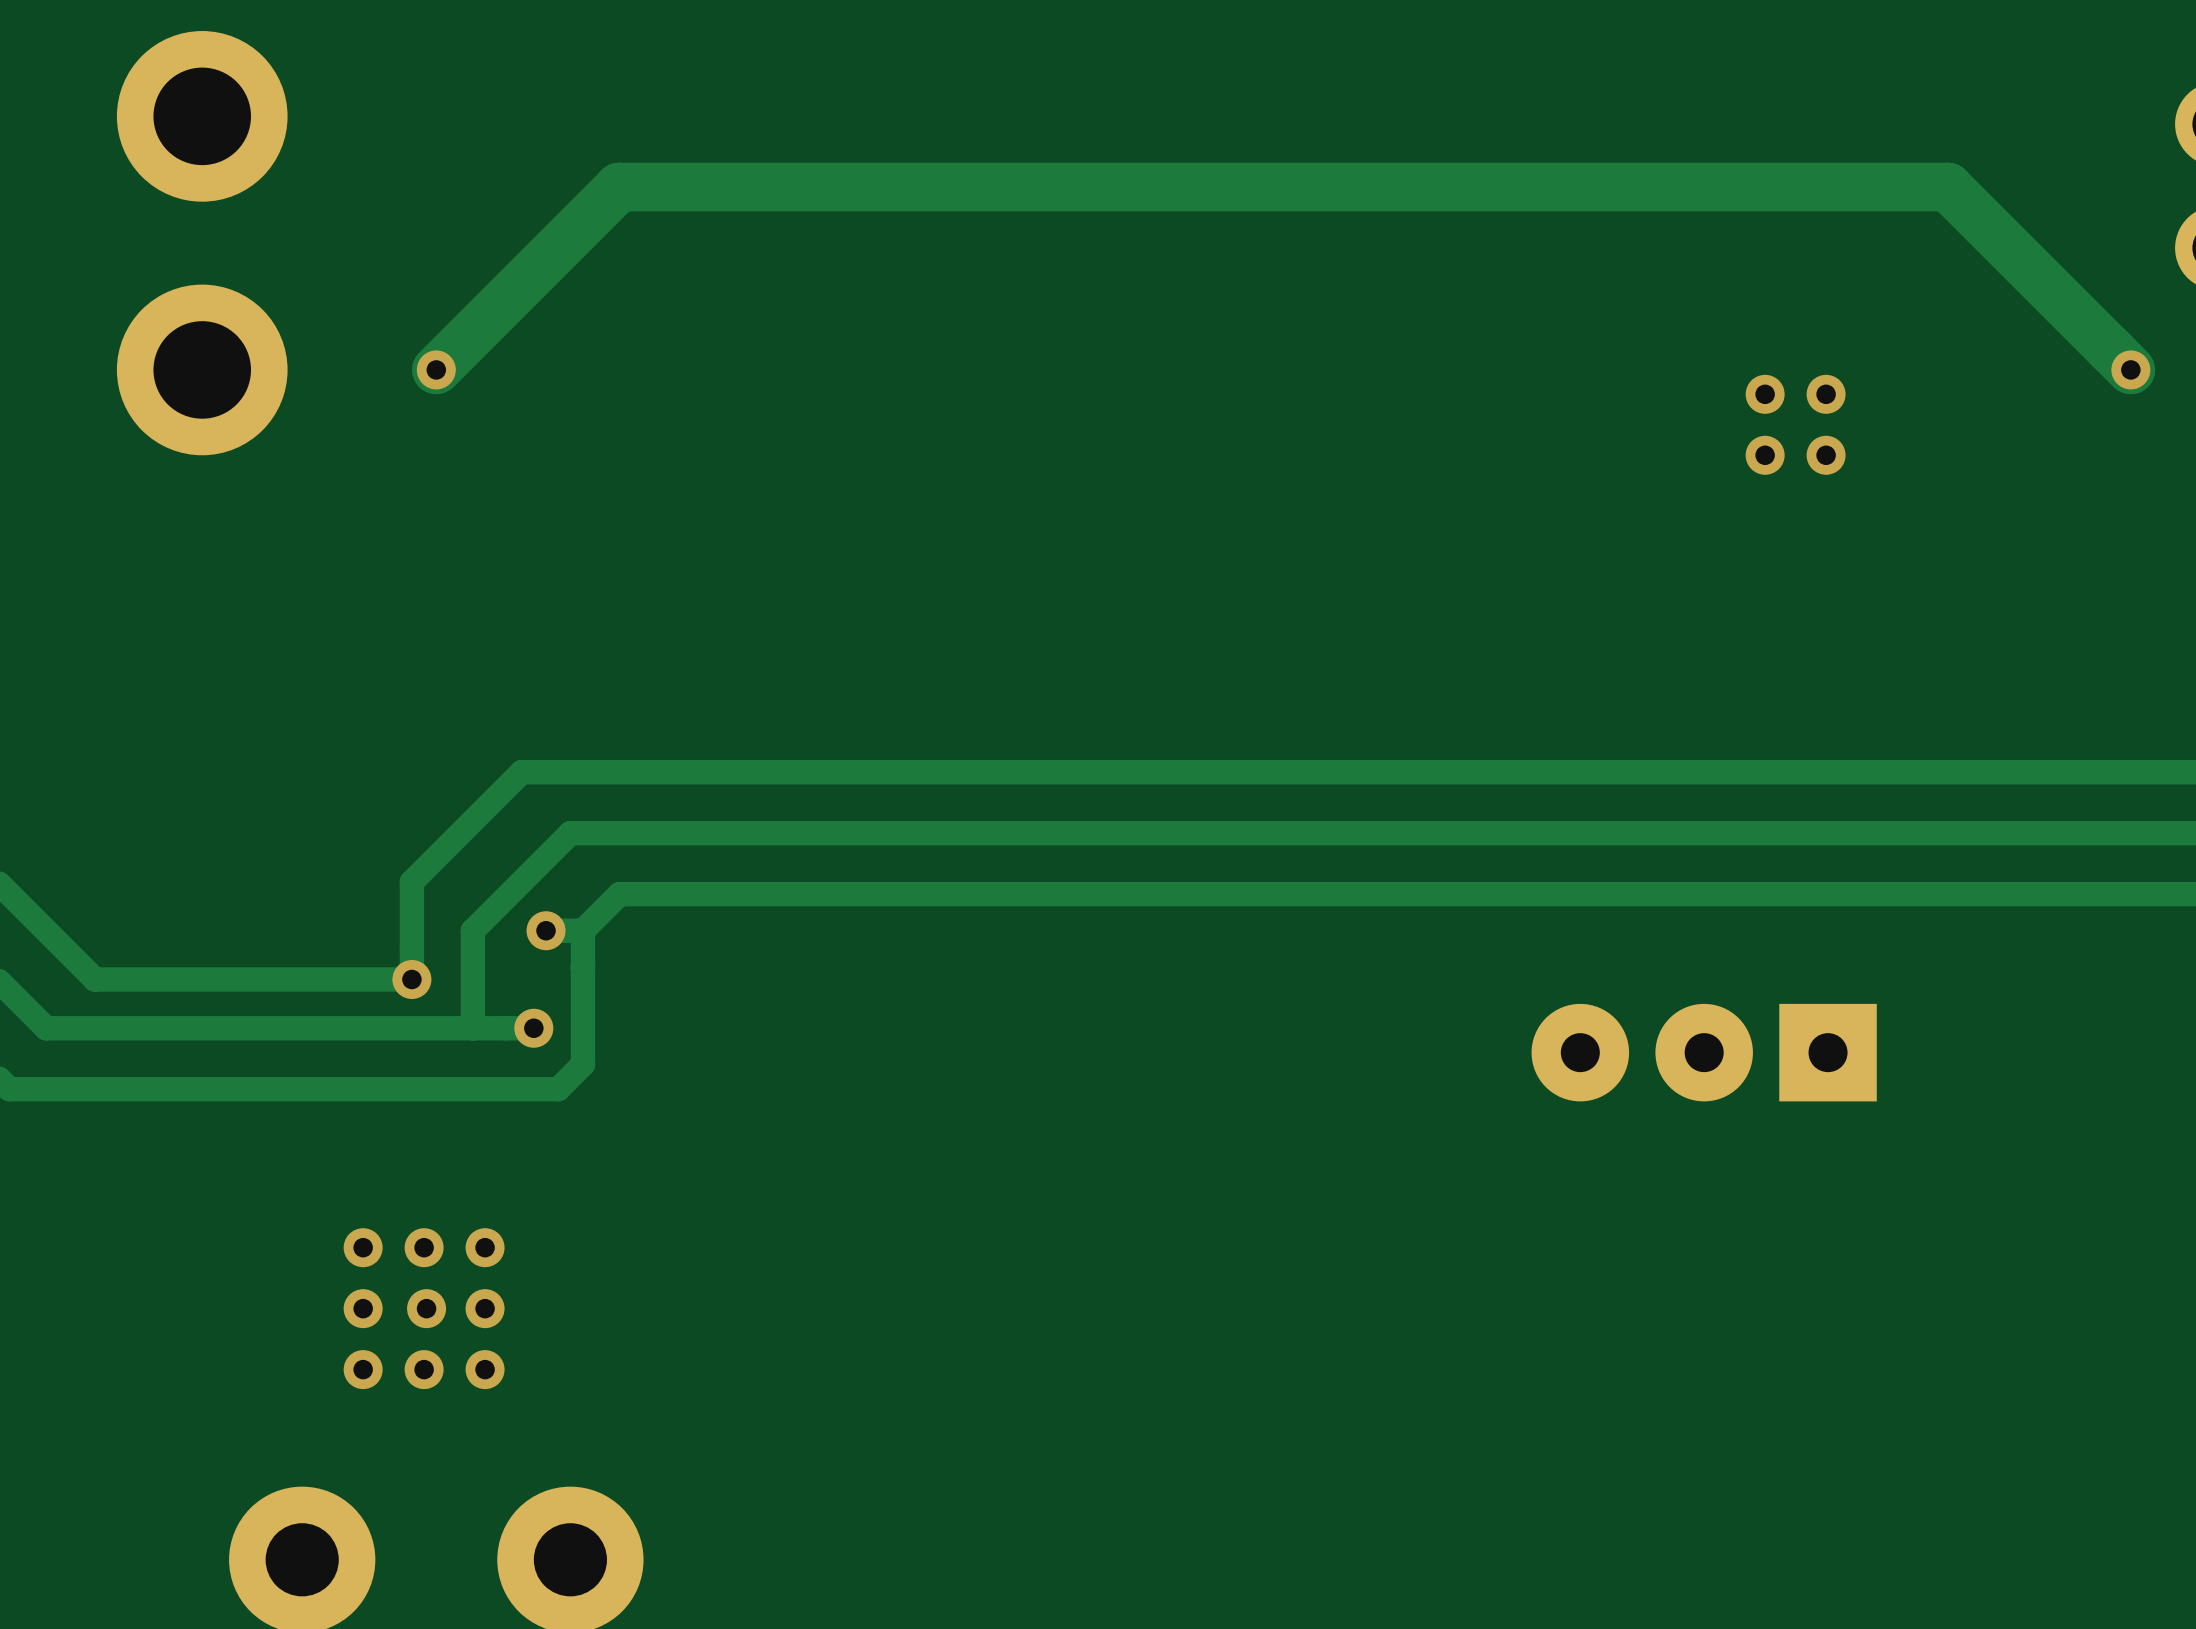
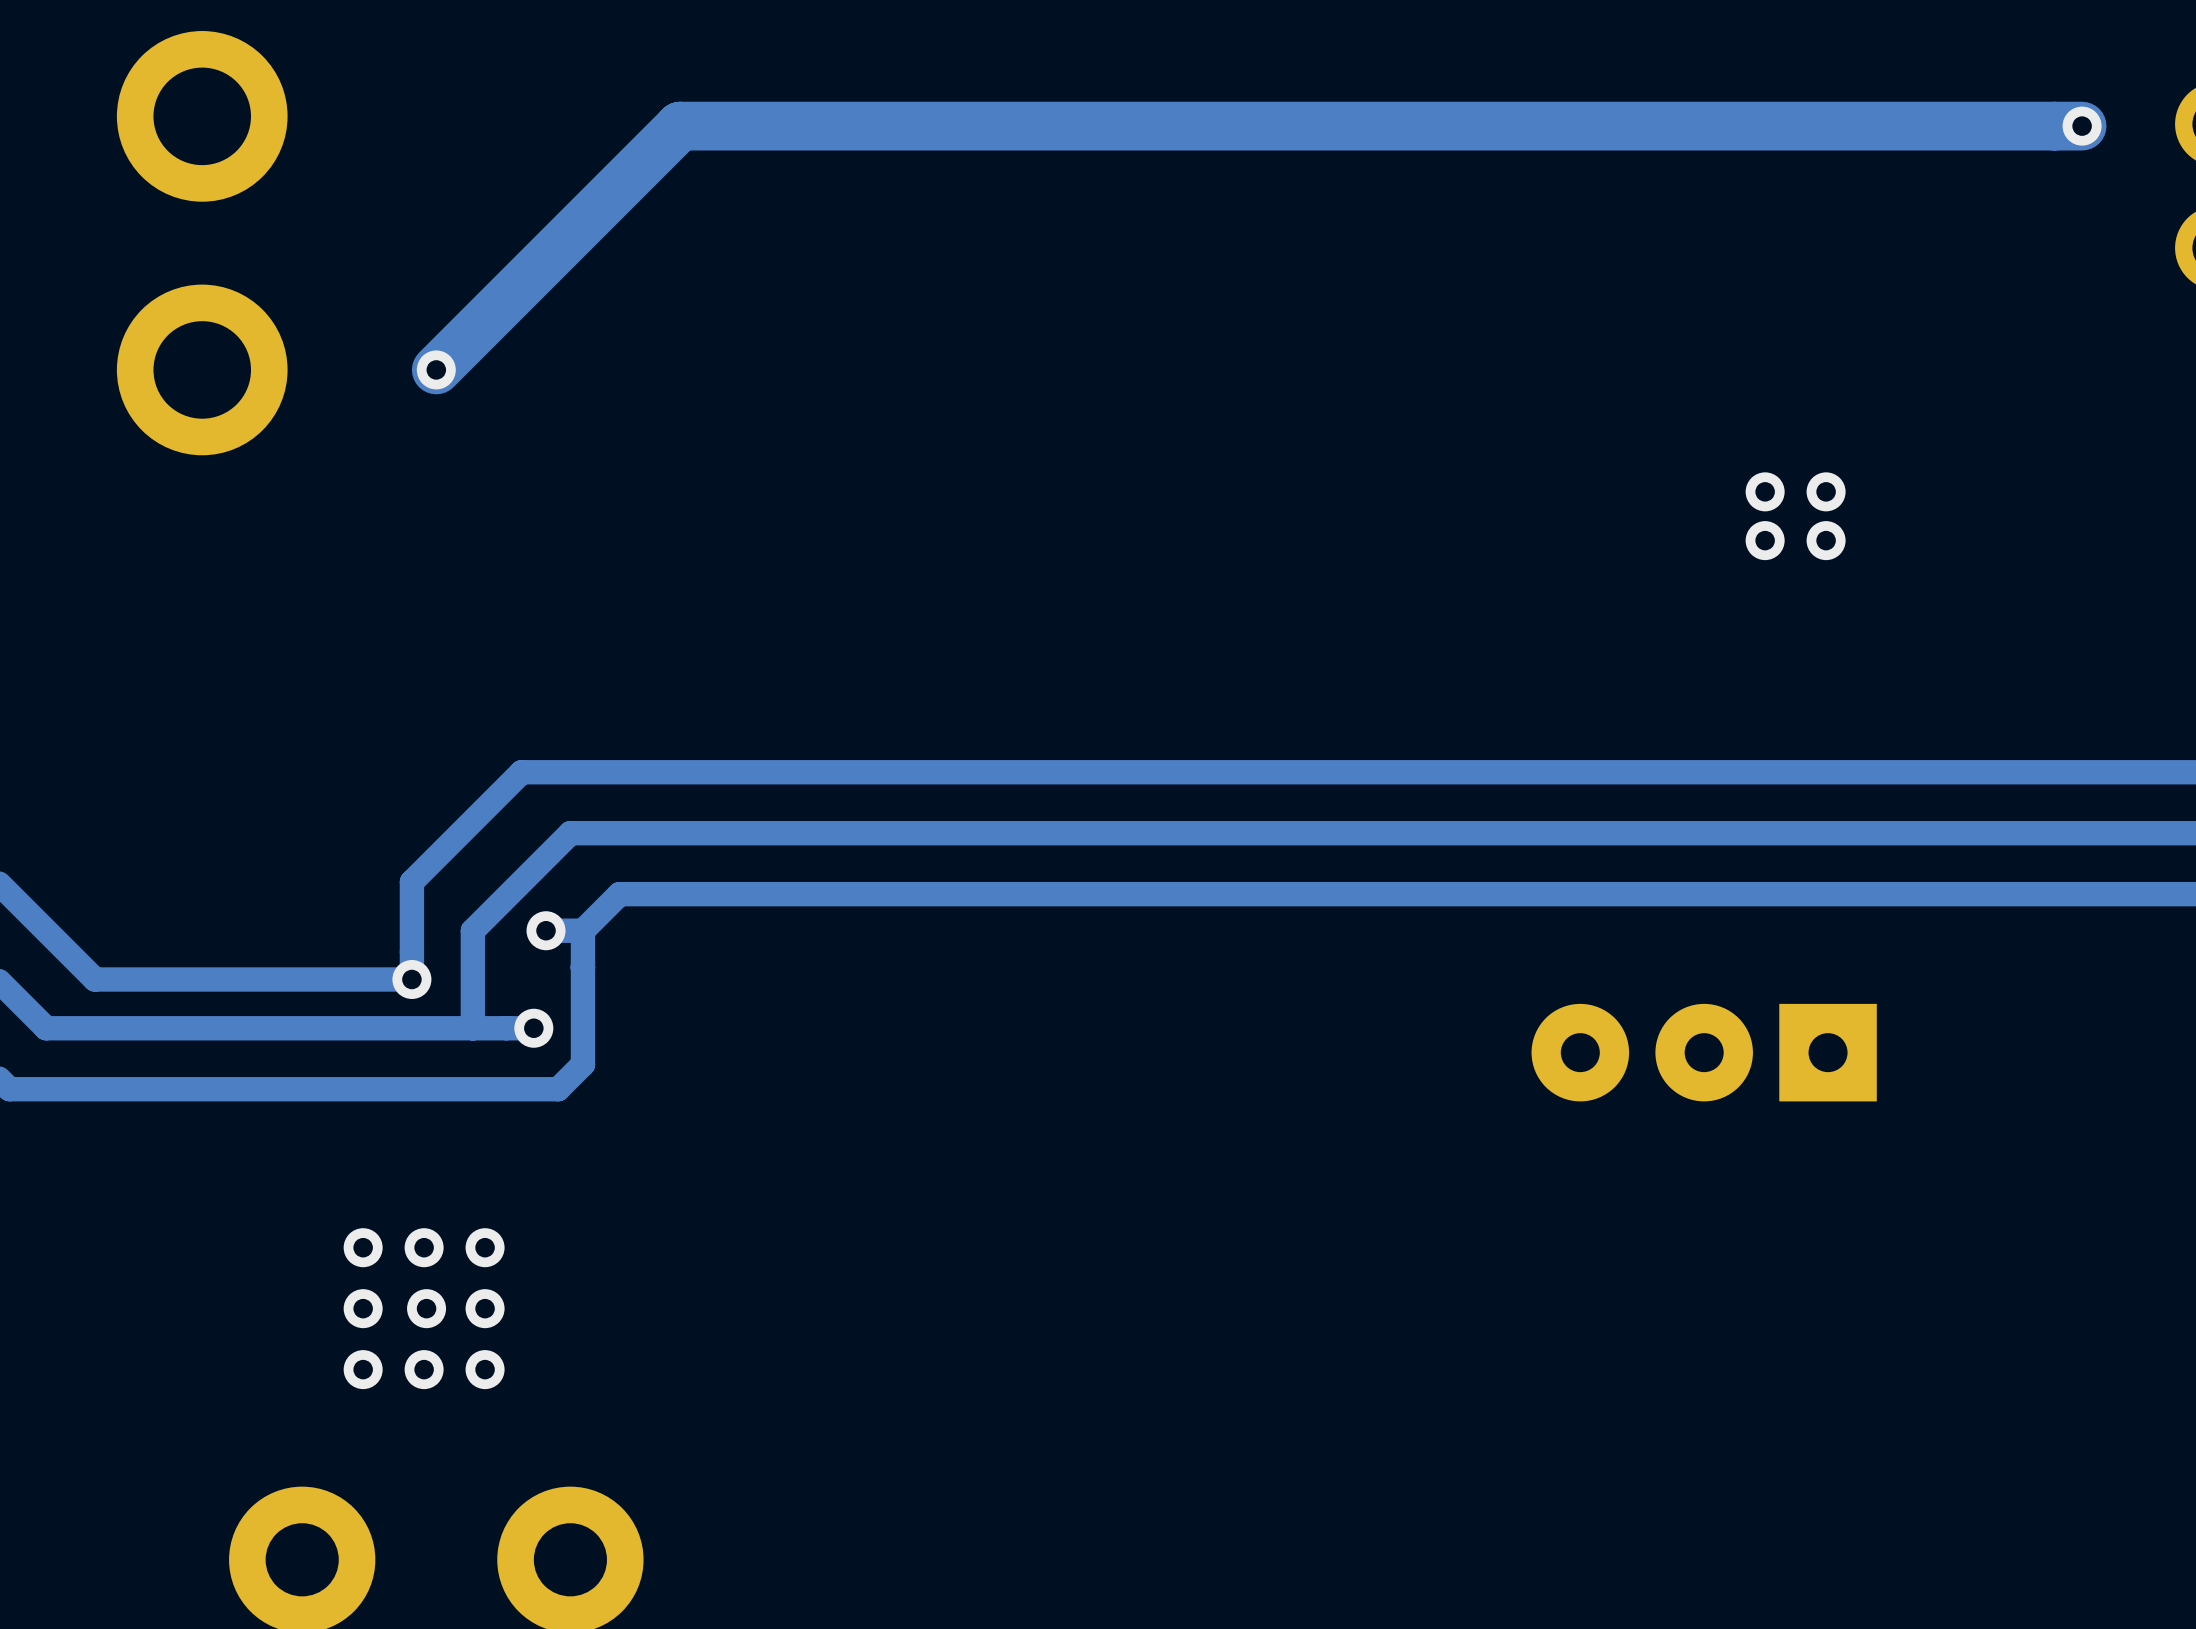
via: none -> (2082, 126)
track: (619, 187) (1948, 187) (2130, 369) -> (619, 187) (680, 126) (2082, 126)
via: (2130, 369) -> none
via: (1765, 394) -> none
via: (1826, 394) -> none
via position: (1765, 455) -> (1765, 491)
via position: (1826, 455) -> (1826, 491)
via: none -> (1765, 540)
via: none -> (1826, 540)

